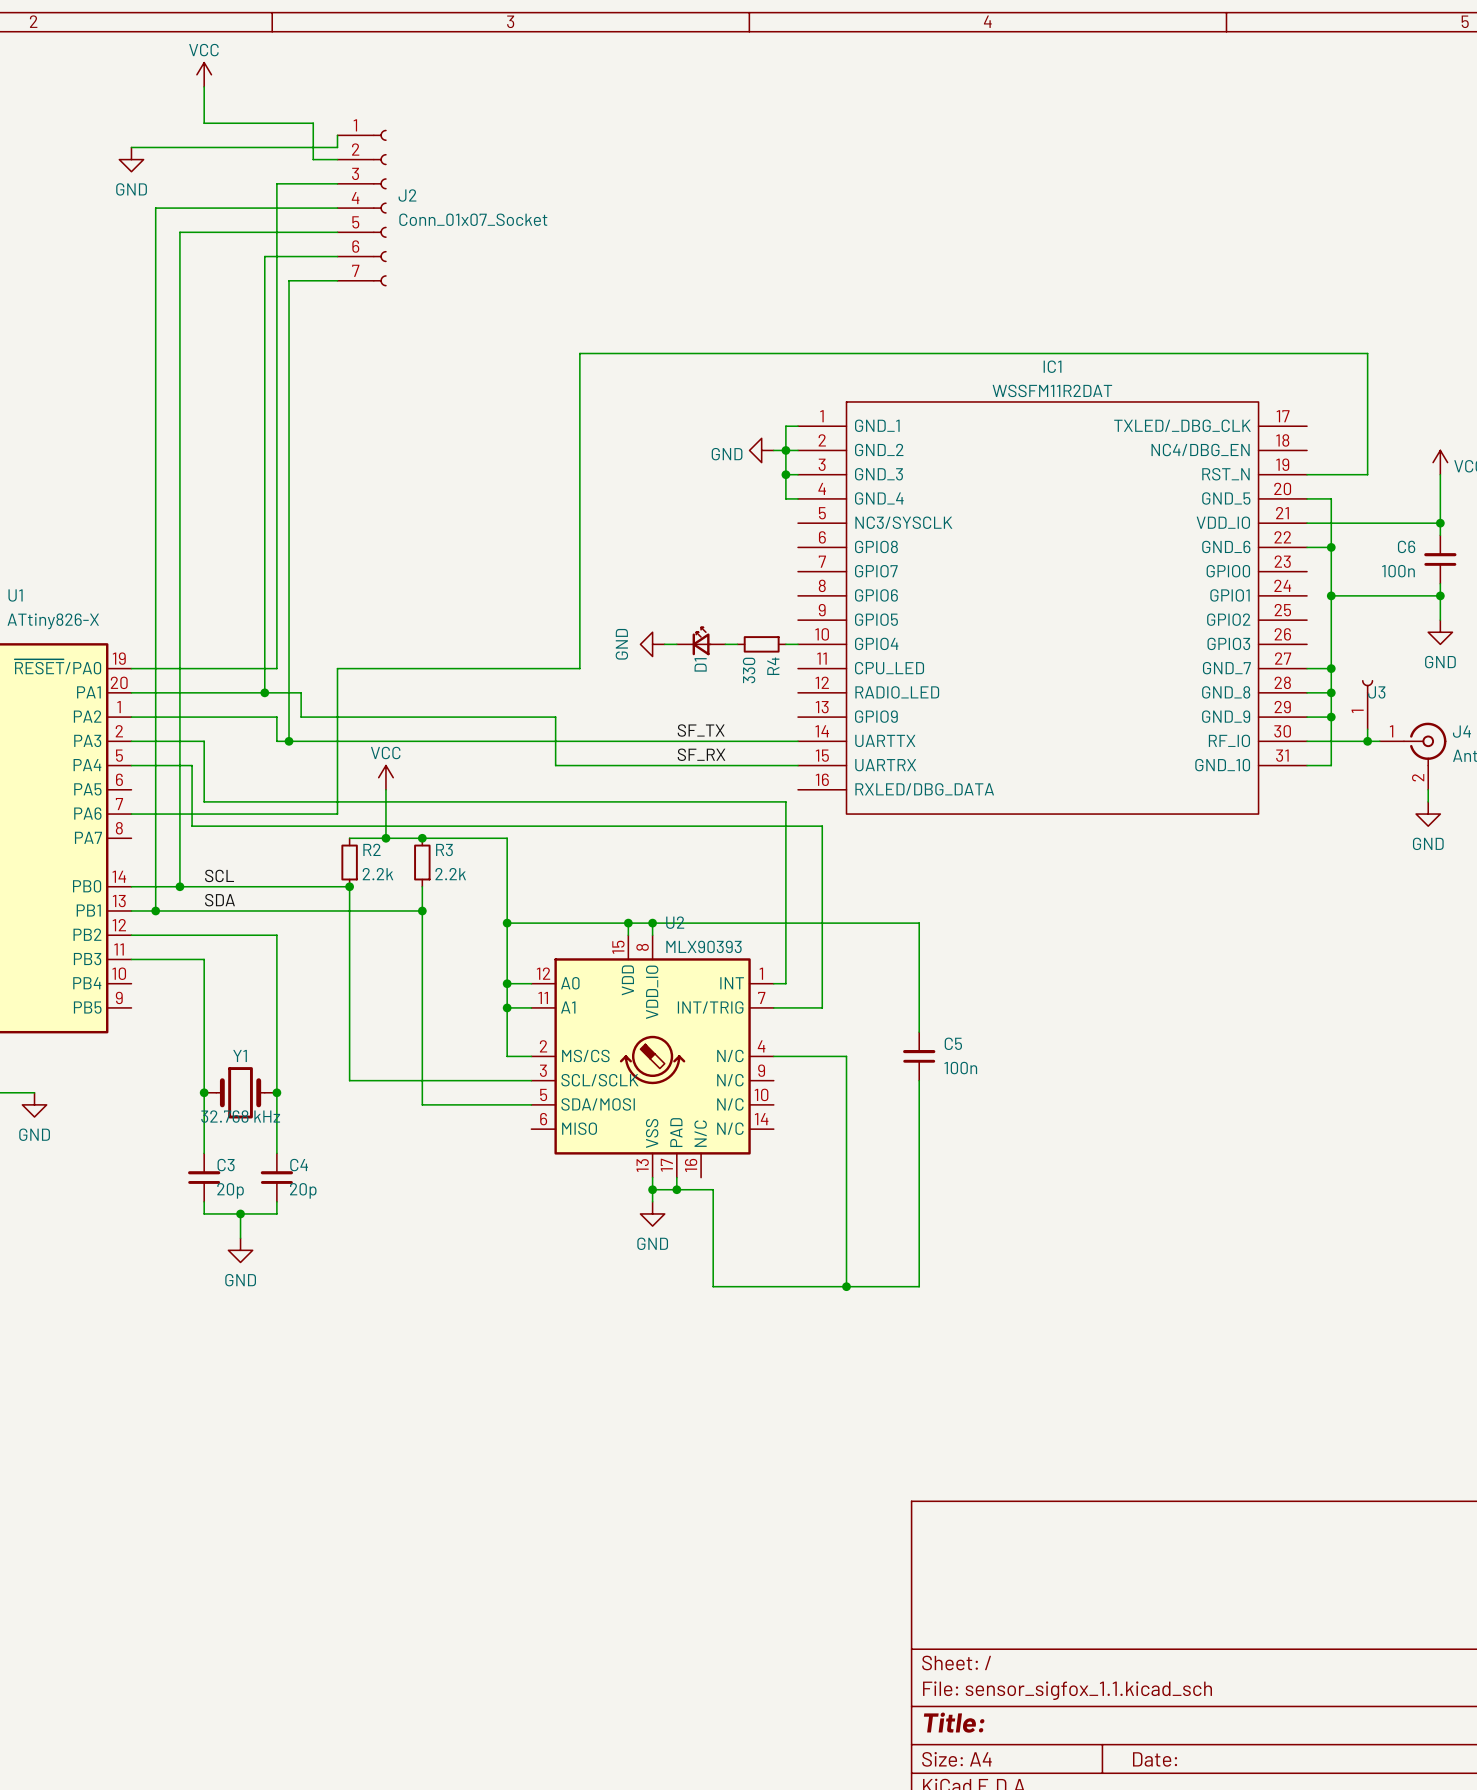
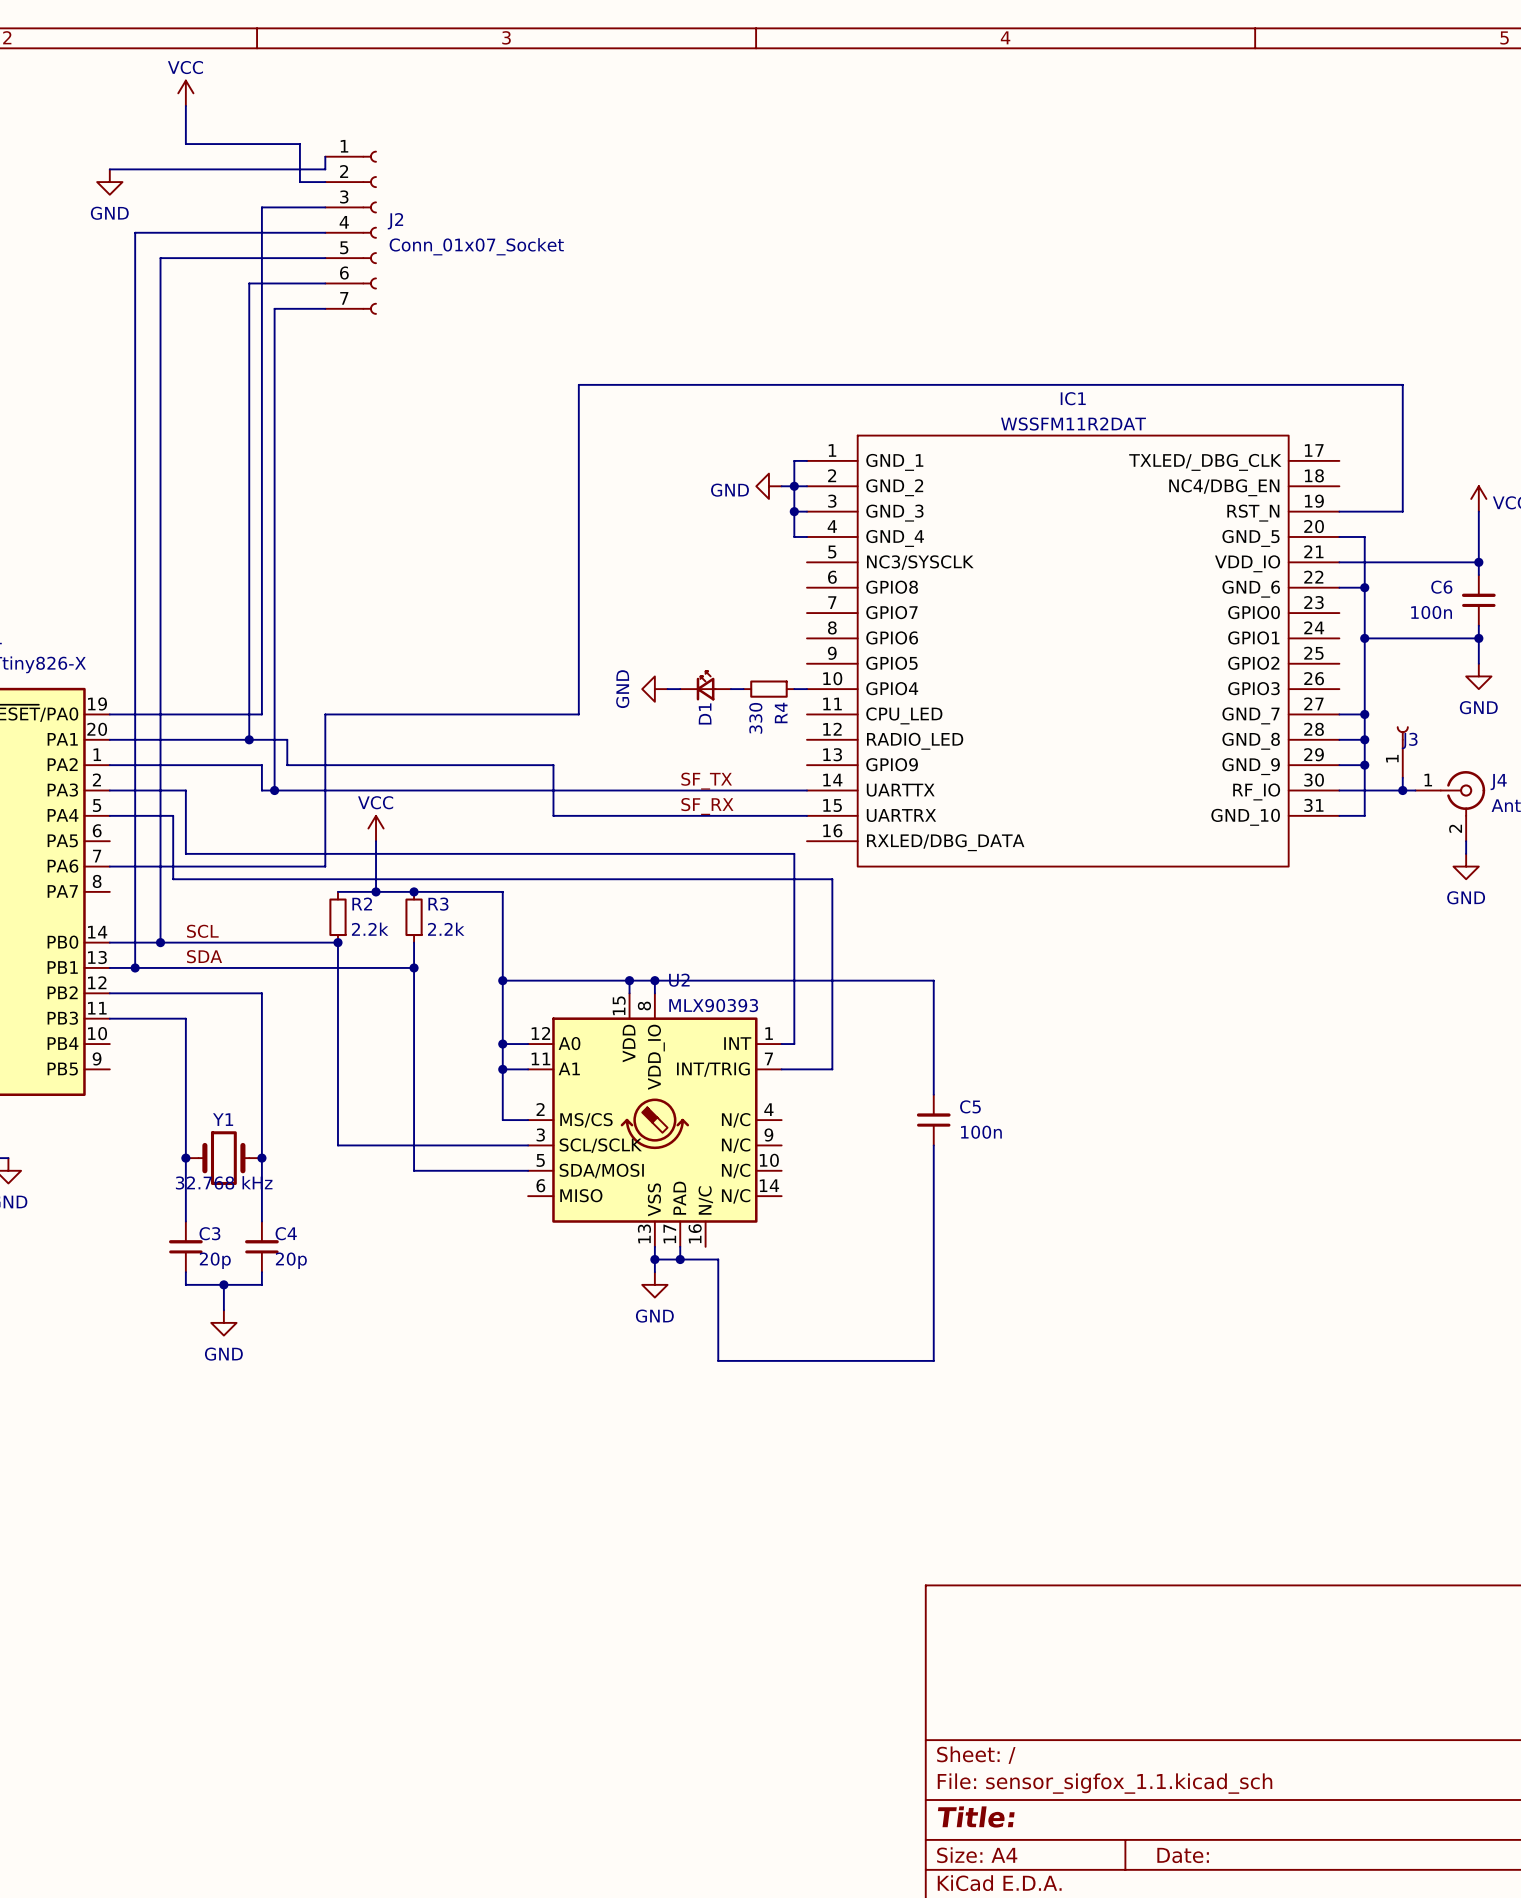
wire: (773, 1056) (846, 1056) (846, 1286) -> none
junction: (846, 1286) -> none

